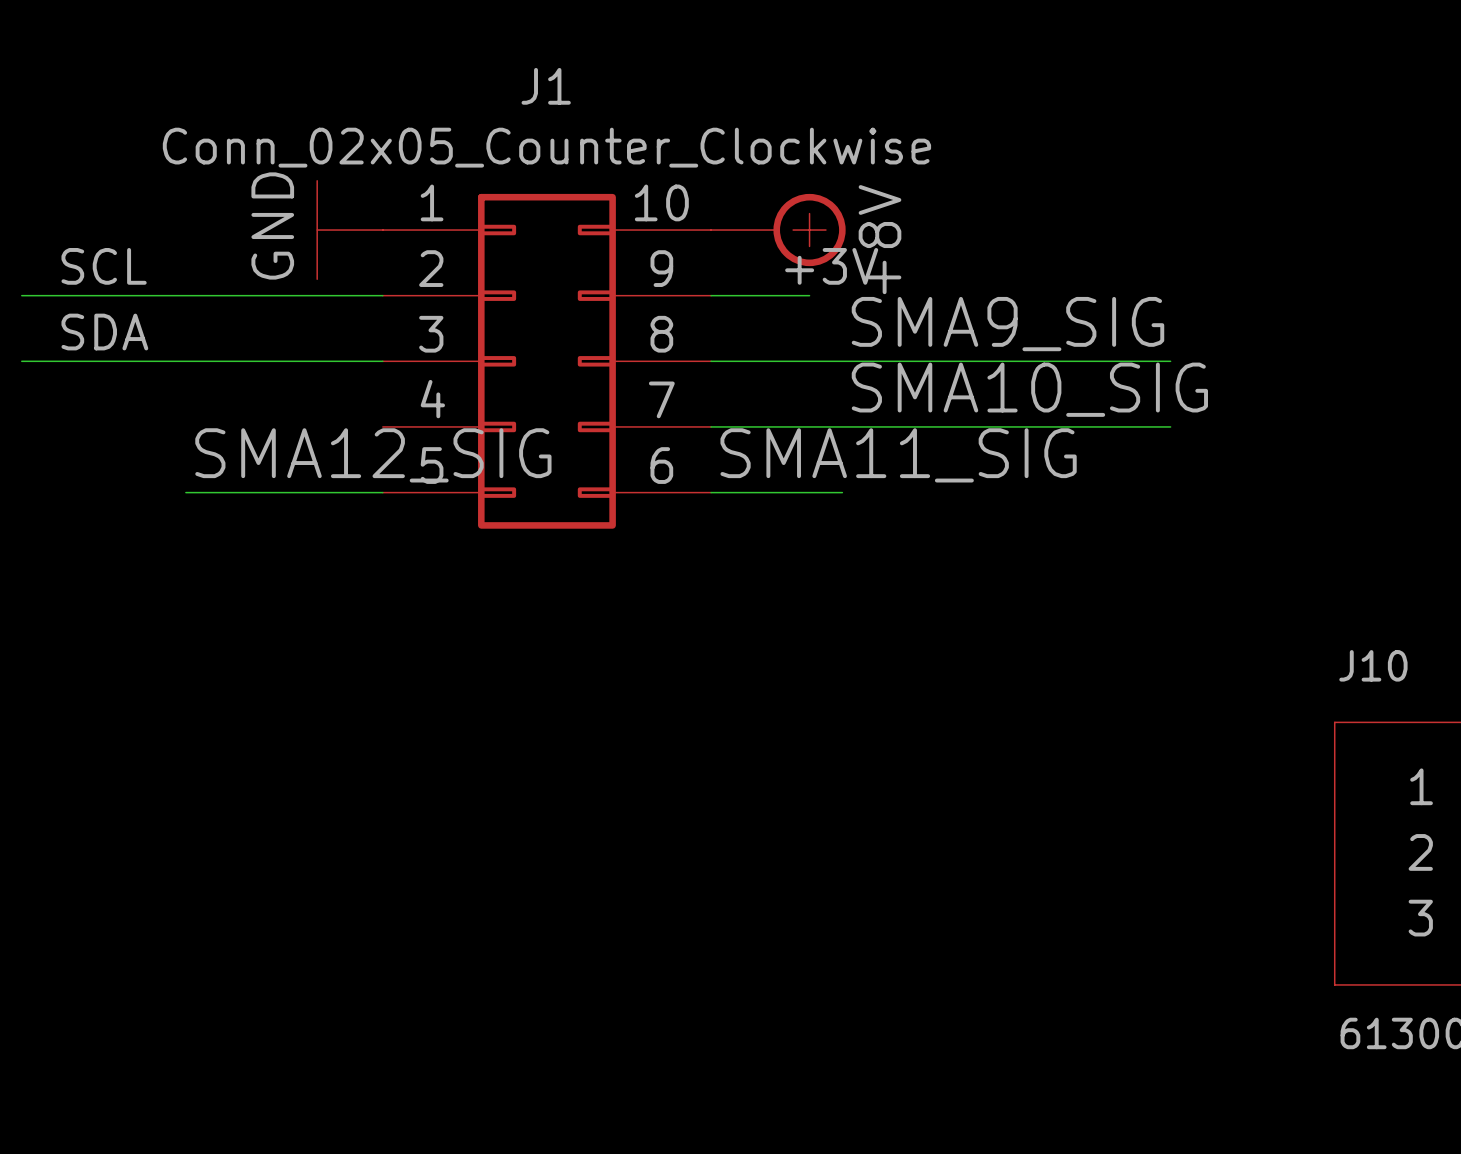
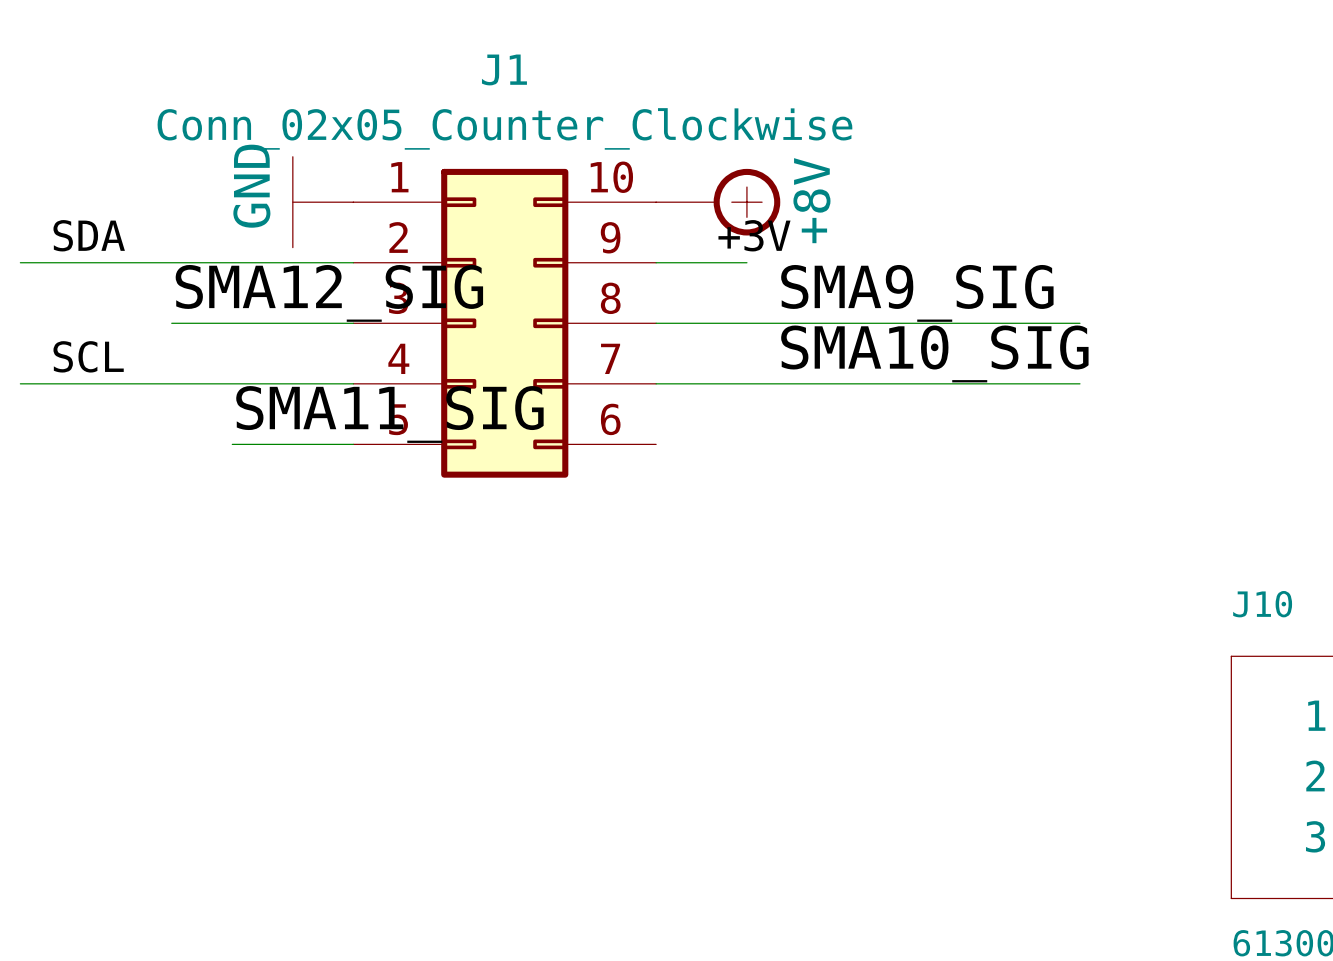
label: SCL (104, 266) -> SDA (89, 235)
label: SDA (104, 332) -> none
wire: (21, 361) (185, 361) -> none
label: none -> SCL (88, 356)
wire: none -> (20, 383) (353, 383)
label position: SMA12_SIG (373, 455) -> SMA12_SIG (329, 293)
label position: SMA11_SIG (898, 455) -> SMA11_SIG (389, 414)
wire: (185, 492) (251, 492) -> none
wire: (711, 492) (842, 492) -> none

